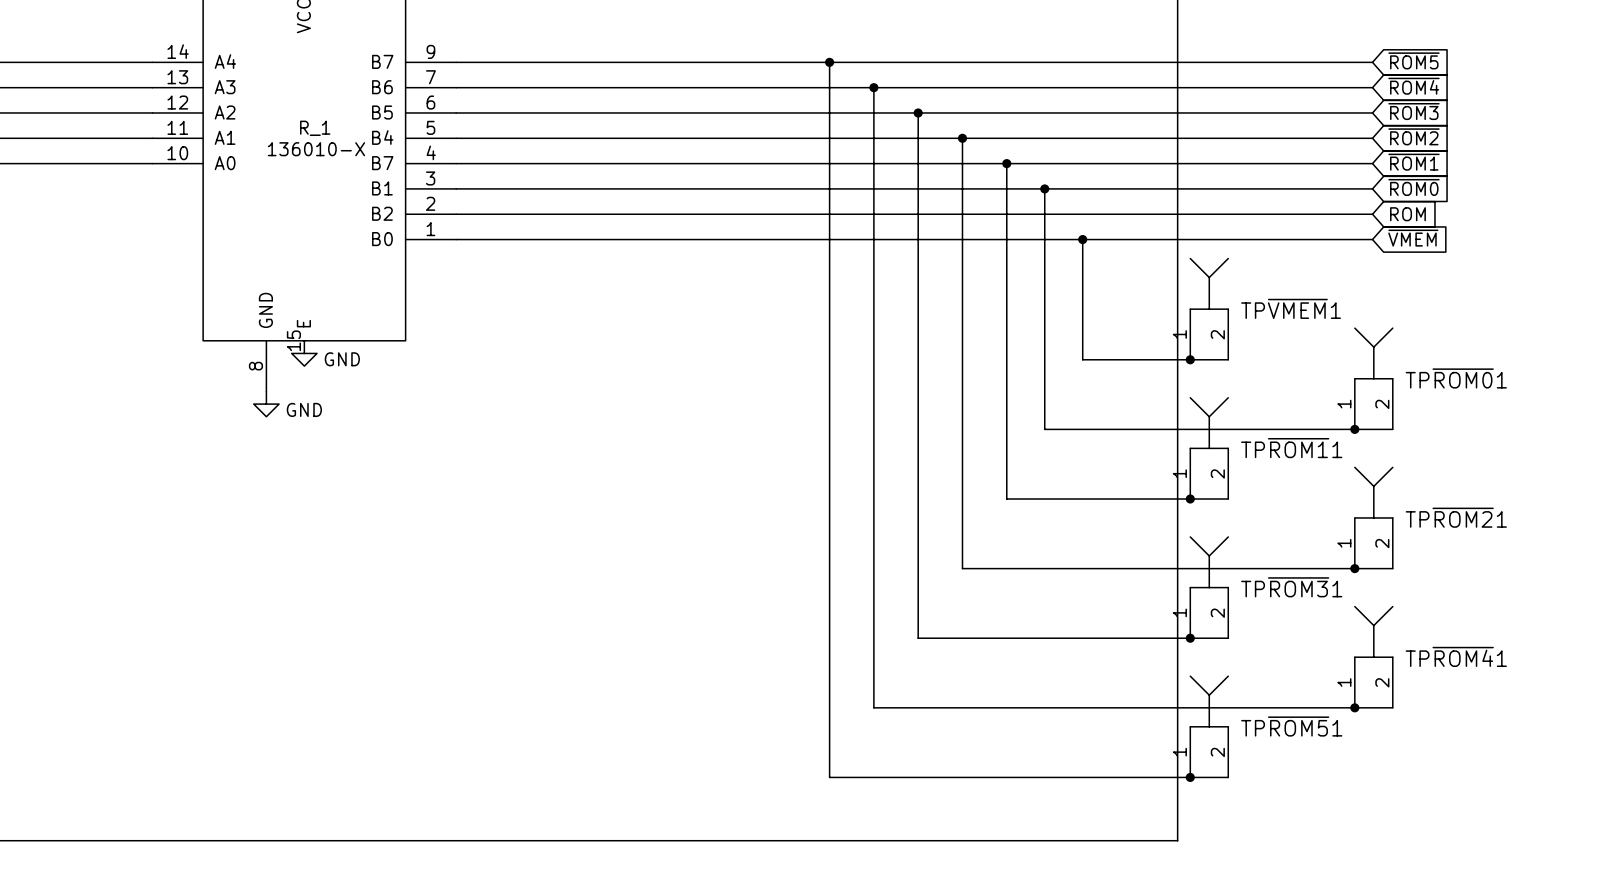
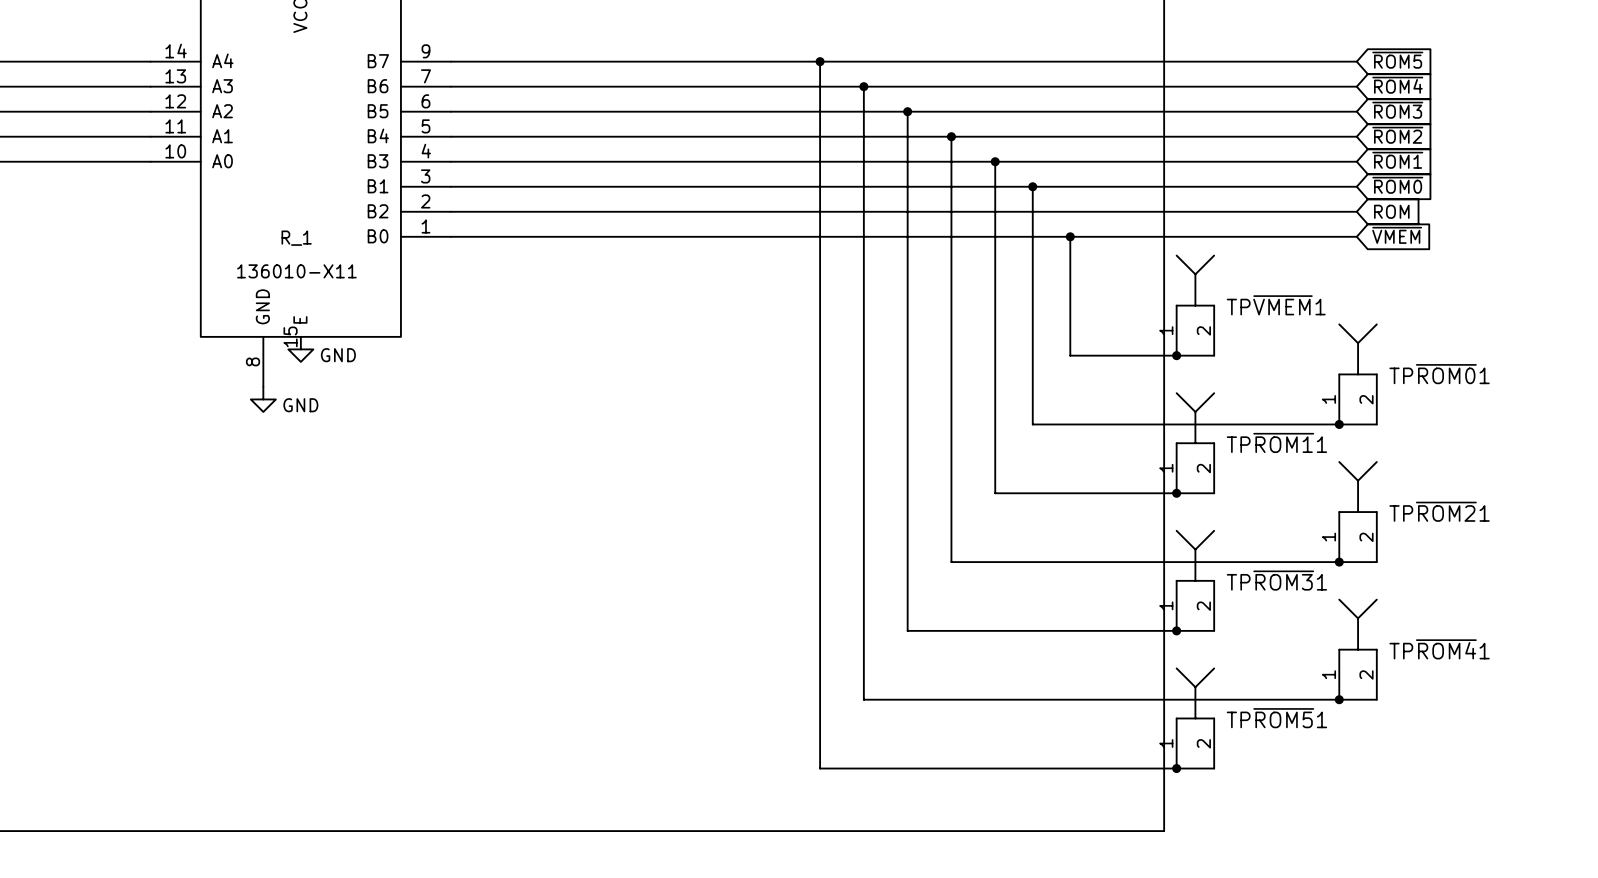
R_1 name position: R_1 (315, 128) -> R_1 (296, 238)
R_1 value: 136010-X (316, 149) -> 136010-X11 (296, 271)
R_1 pin name: B7 (382, 163) -> B3 (378, 161)

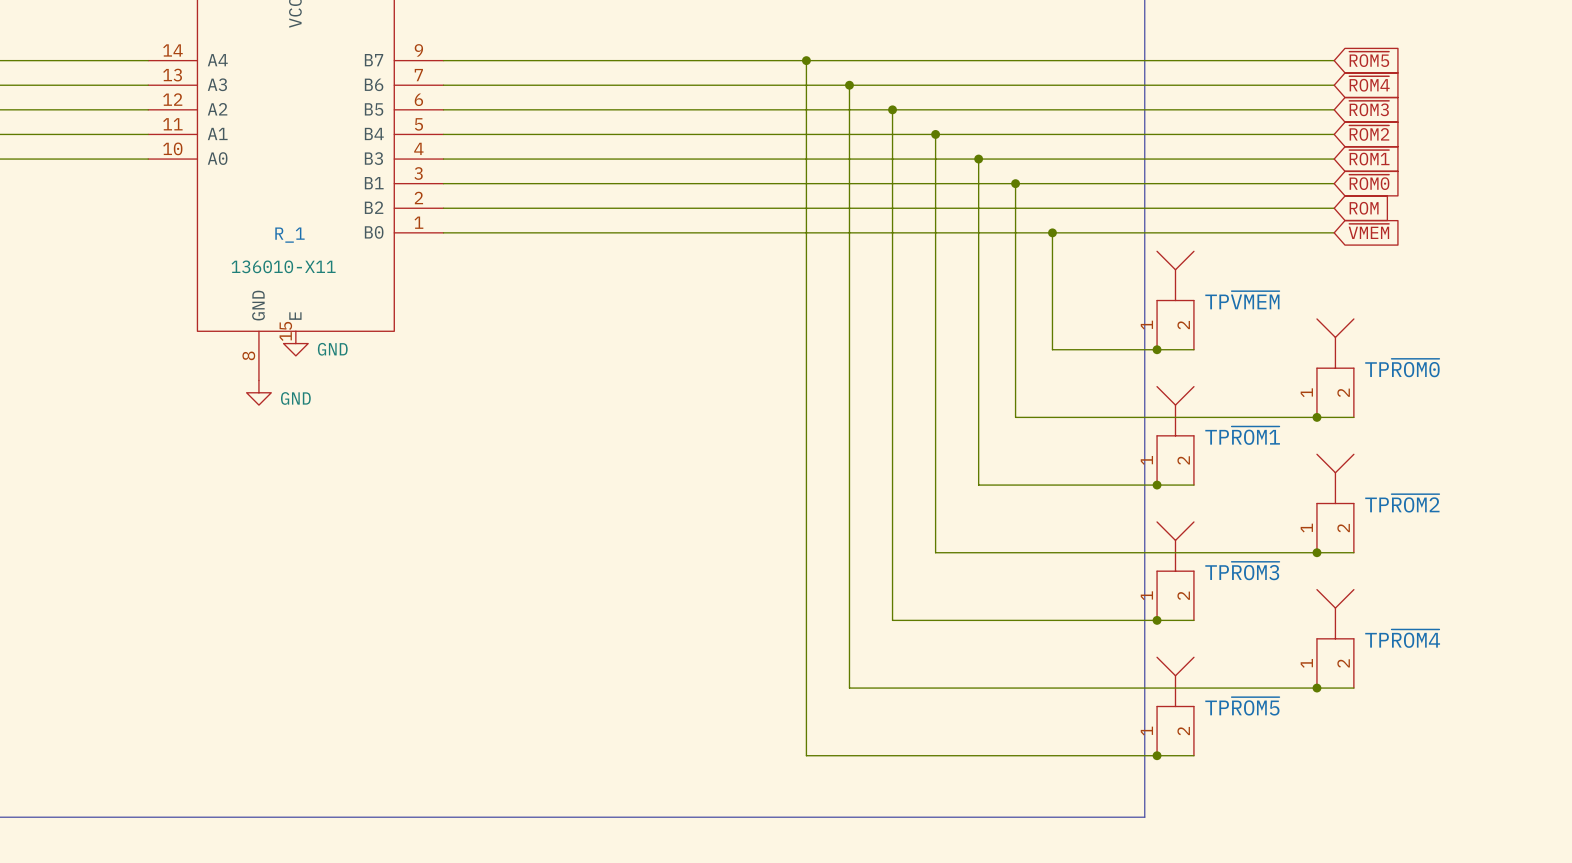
TP~{VMEM}1 name: TP~{VMEM}1 (1276, 305) -> TP~{VMEM} (1242, 300)
TP~{ROM0}1 name: TP~{ROM0}1 (1439, 374) -> TP~{ROM0} (1402, 368)
TP~{ROM1}1 name: TP~{ROM1}1 (1276, 442) -> TP~{ROM1} (1242, 435)
TP~{ROM2}1 name: TP~{ROM2}1 (1439, 511) -> TP~{ROM2} (1402, 503)
TP~{ROM3}1 name: TP~{ROM3}1 (1276, 580) -> TP~{ROM3} (1242, 571)
TP~{ROM4}1 name: TP~{ROM4}1 (1439, 649) -> TP~{ROM4} (1402, 638)
TP~{ROM5}1 name: TP~{ROM5}1 (1276, 718) -> TP~{ROM5} (1242, 706)

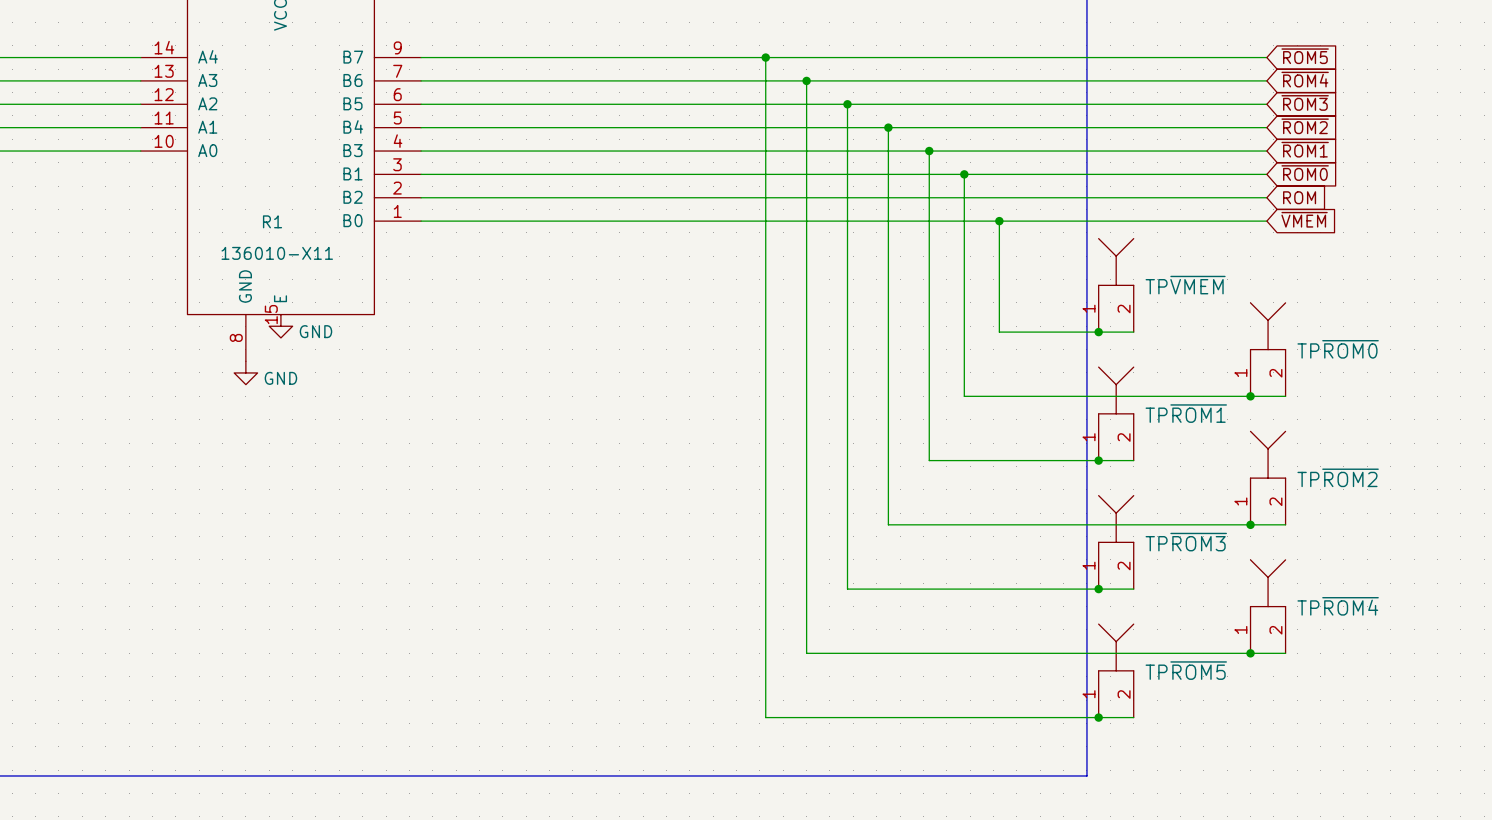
R_1 name: R_1 (289, 235) -> R1 (272, 221)

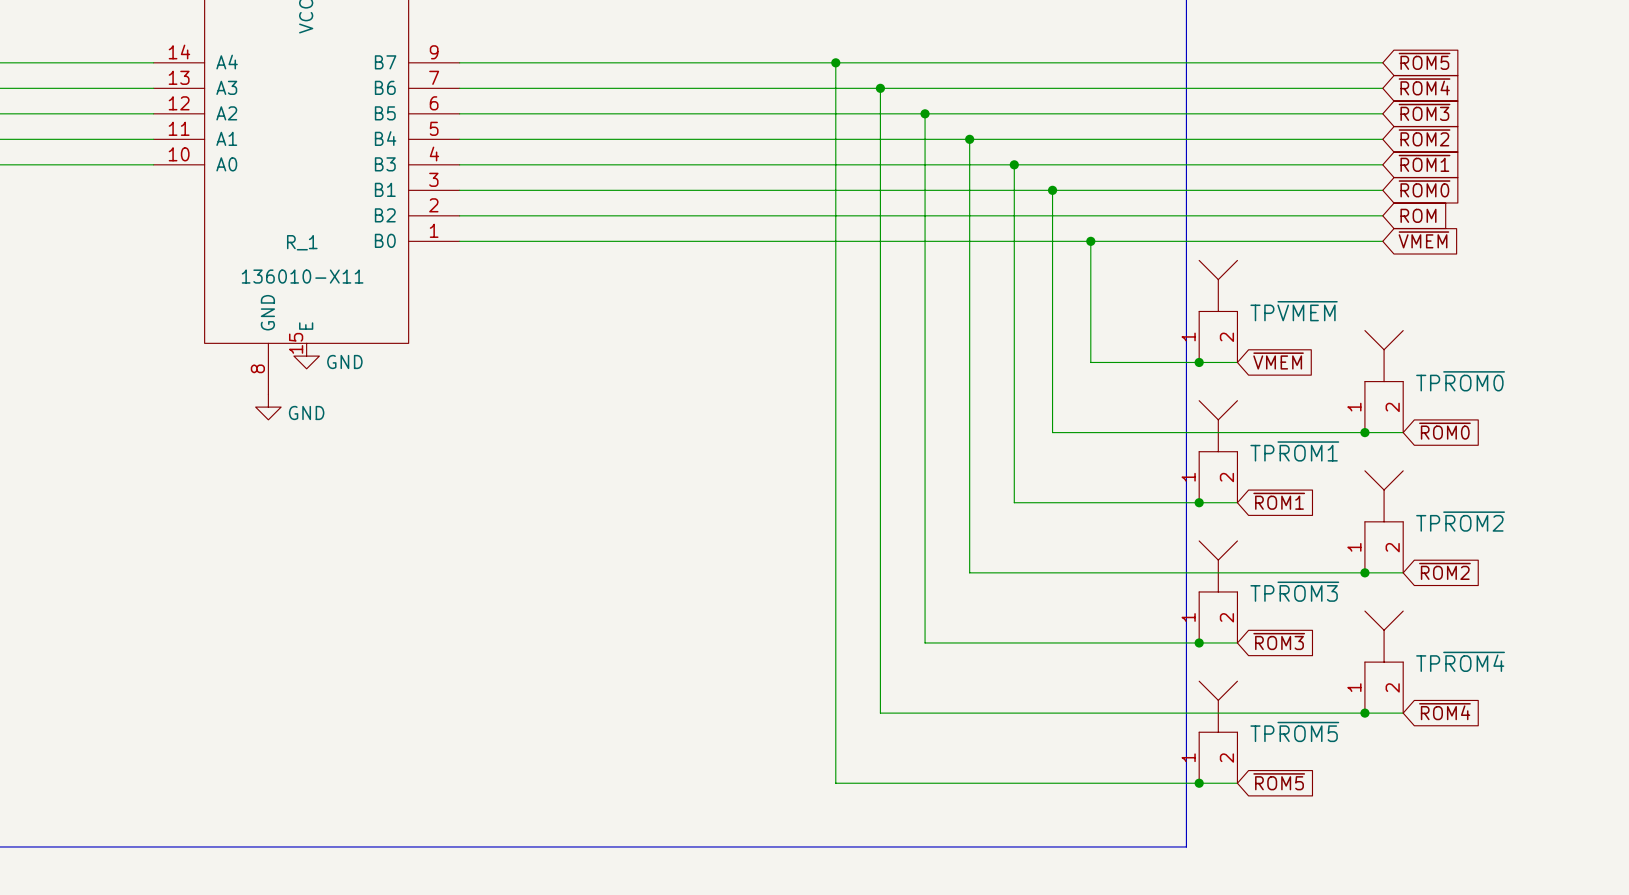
R1 name: R1 (272, 221) -> R_1 (302, 242)
global label: none -> ~{VMEM} (1278, 361)
global label: none -> ~{ROM0} (1444, 431)
global label: none -> ~{ROM1} (1279, 501)
global label: none -> ~{ROM2} (1444, 571)
global label: none -> ~{ROM3} (1279, 641)
global label: none -> ~{ROM4} (1444, 711)
global label: none -> ~{ROM5} (1279, 781)

